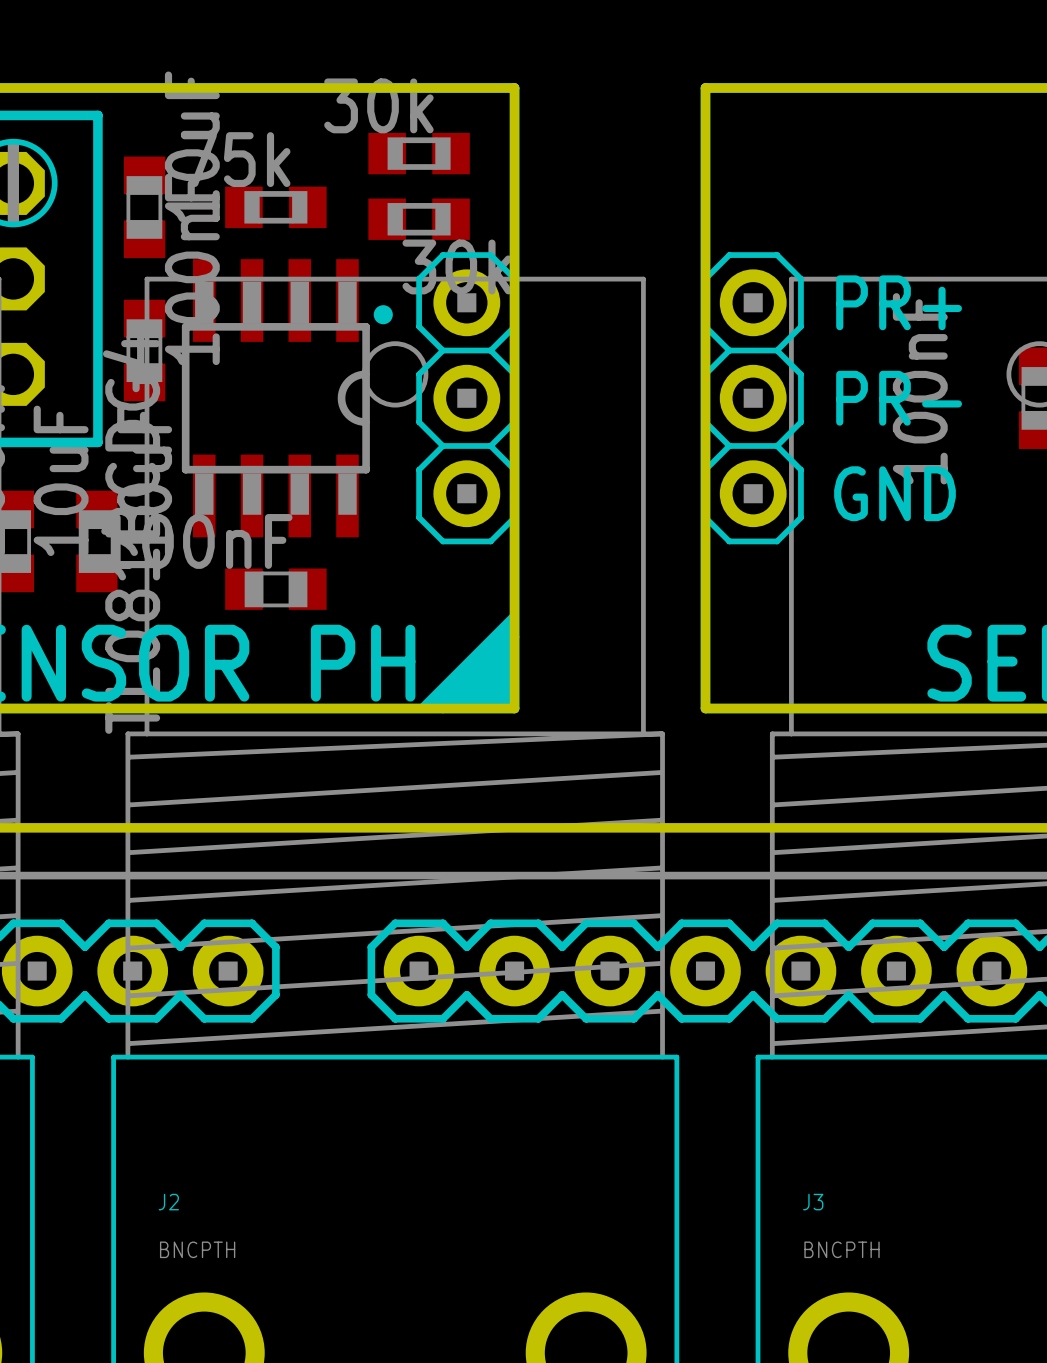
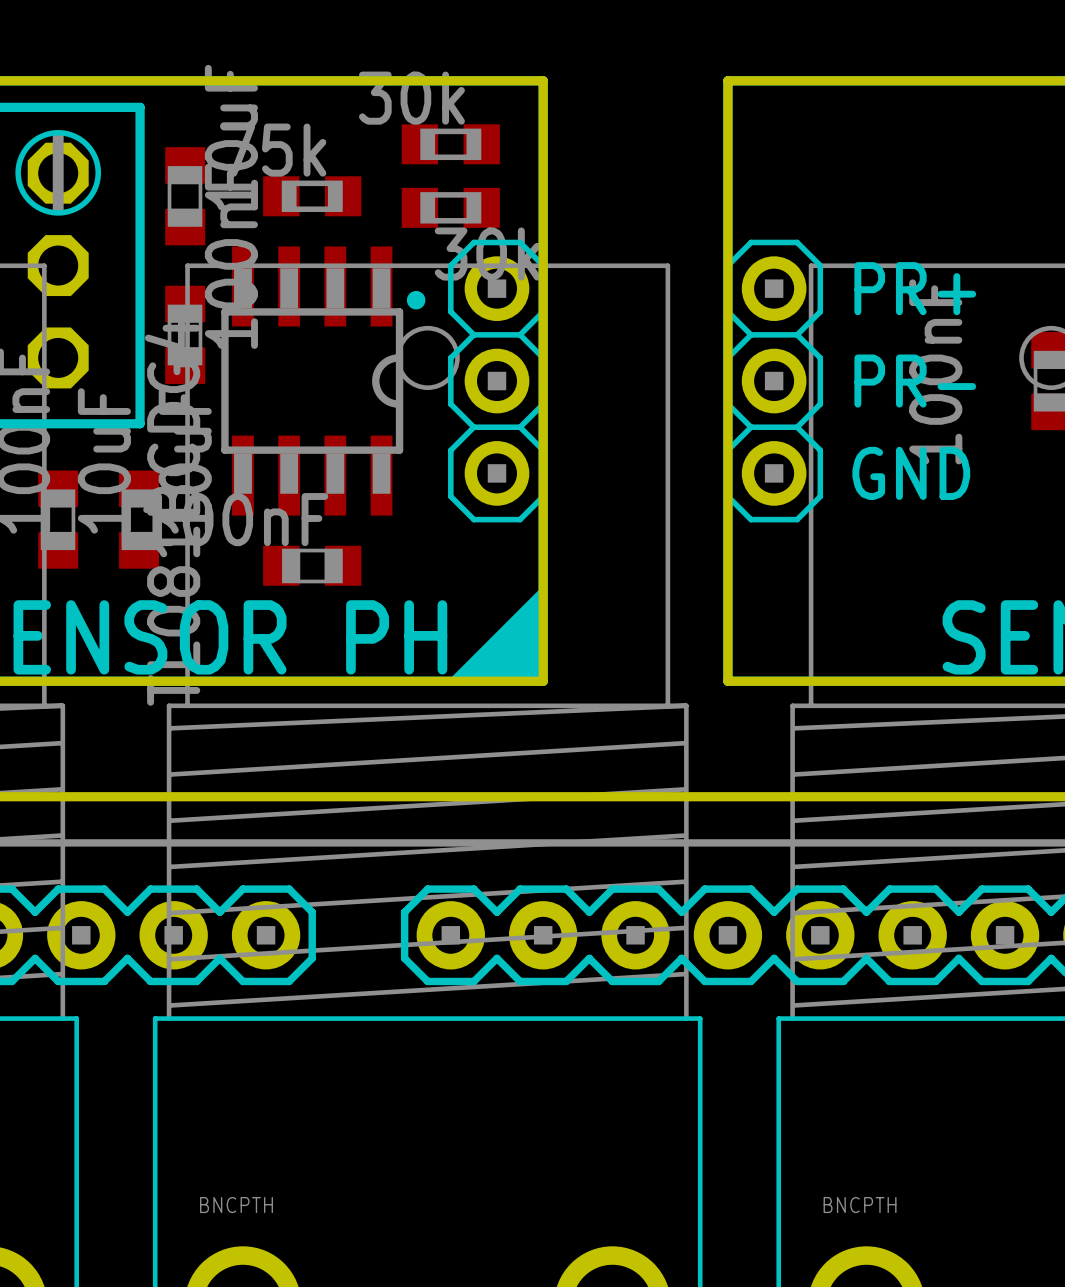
J2 name: J2 (168, 1202) -> none
J3 name: J3 (813, 1202) -> none

